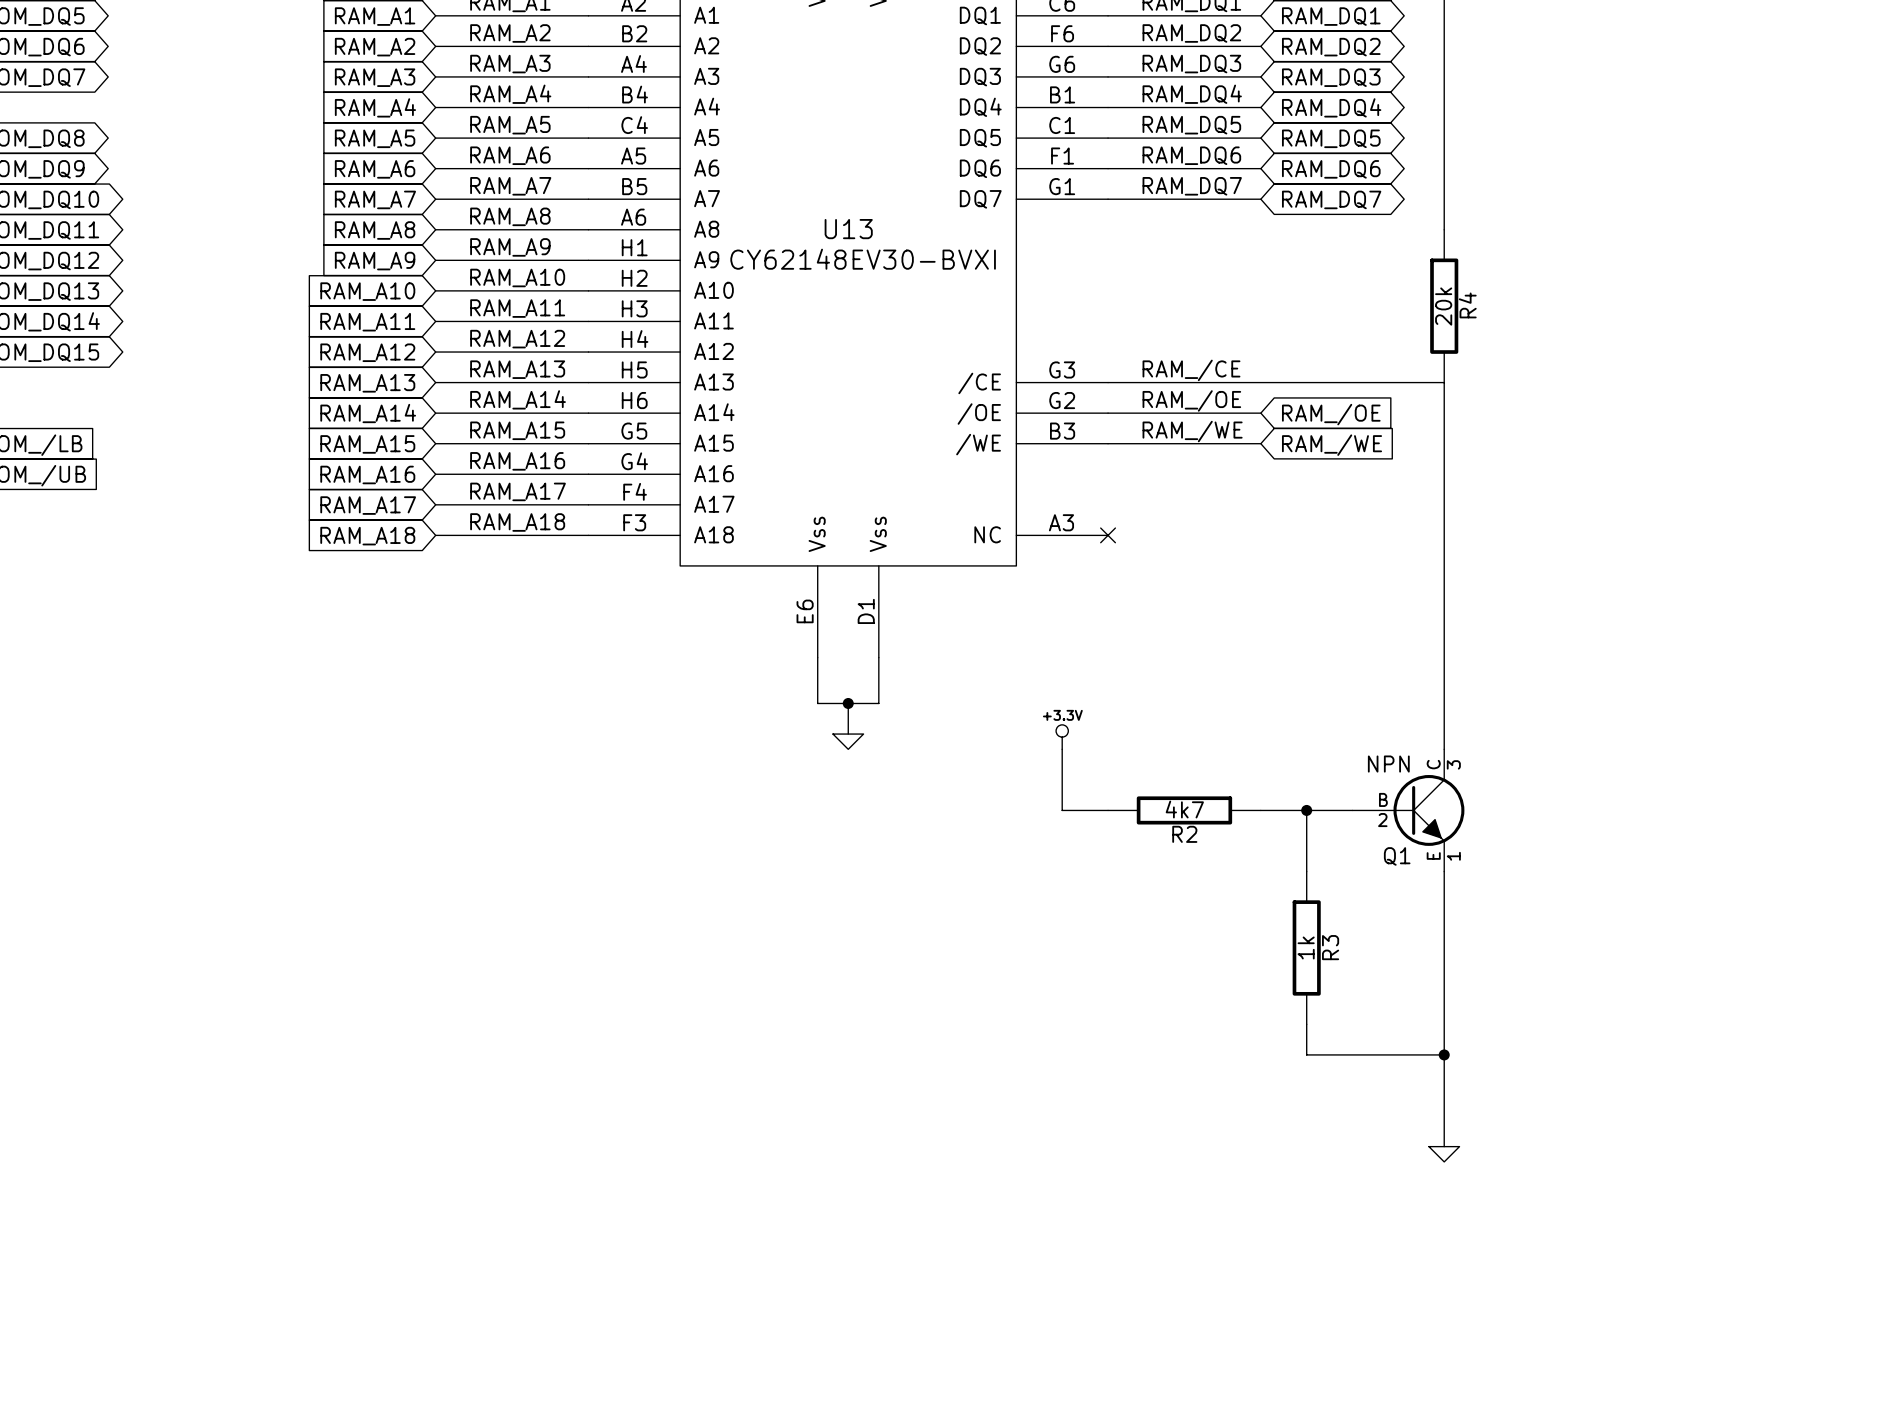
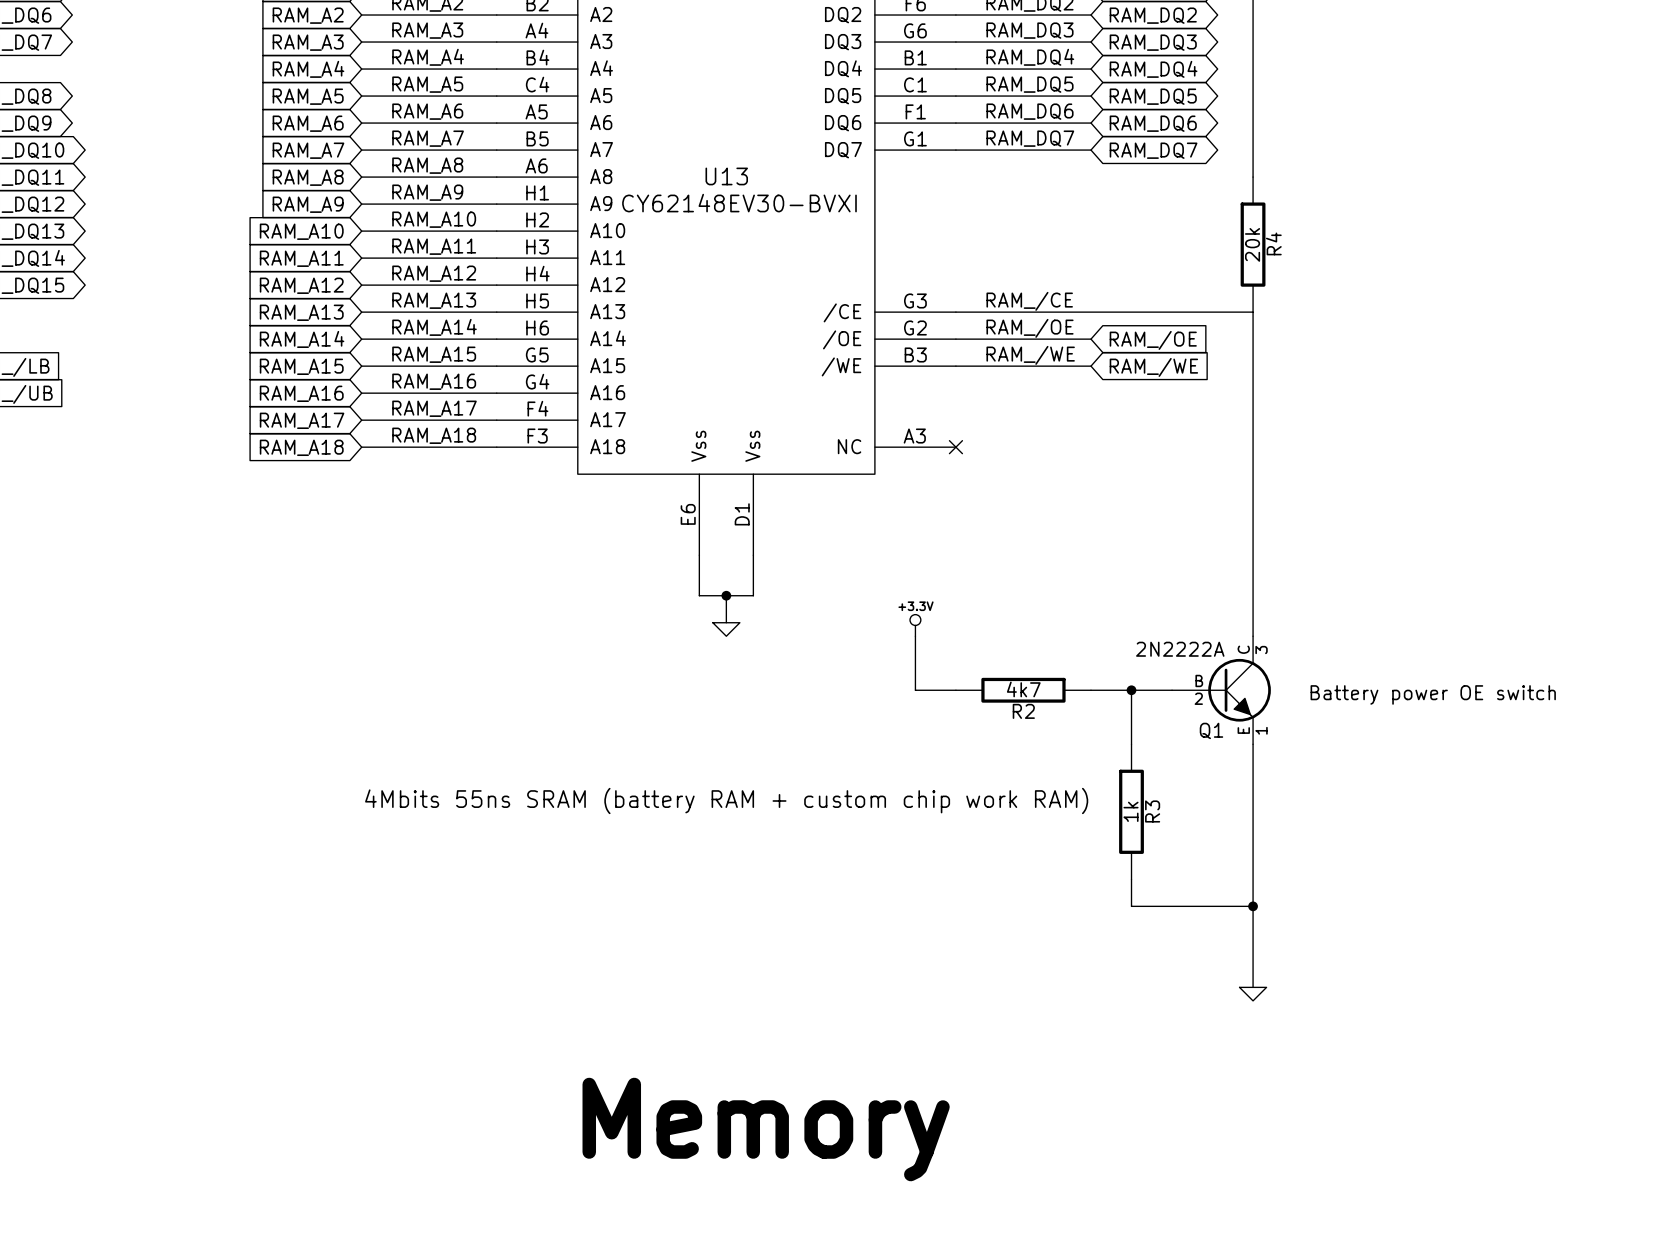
Q1 value: NPN (1388, 764) -> 2N2222A (1180, 649)
text: none -> Battery power OE switch (1433, 694)
text: none -> 4Mbits 55ns SRAM (battery RAM + custom chip work RAM) (726, 800)
text: none -> Memory (766, 1129)

